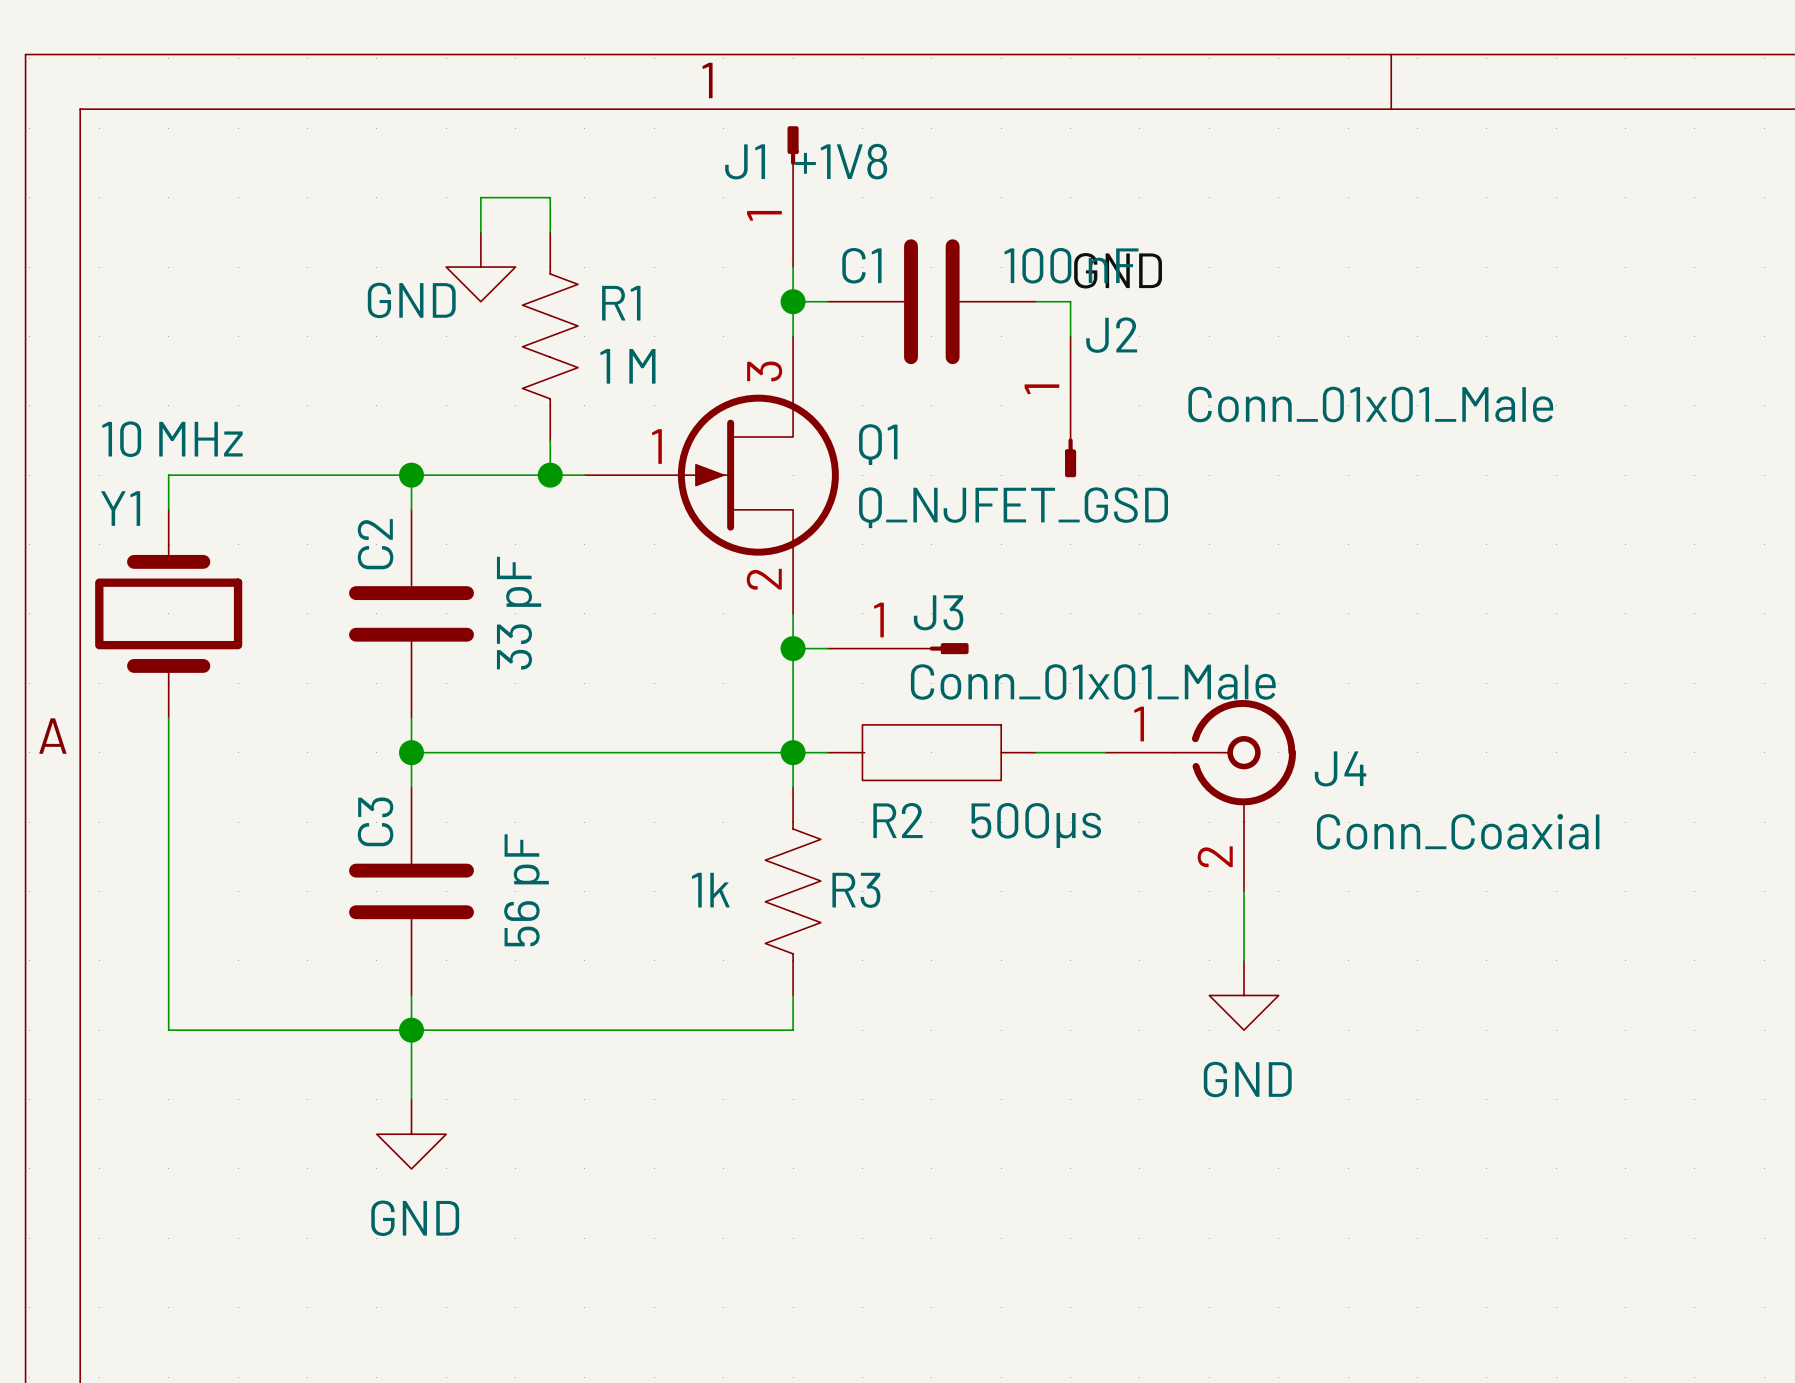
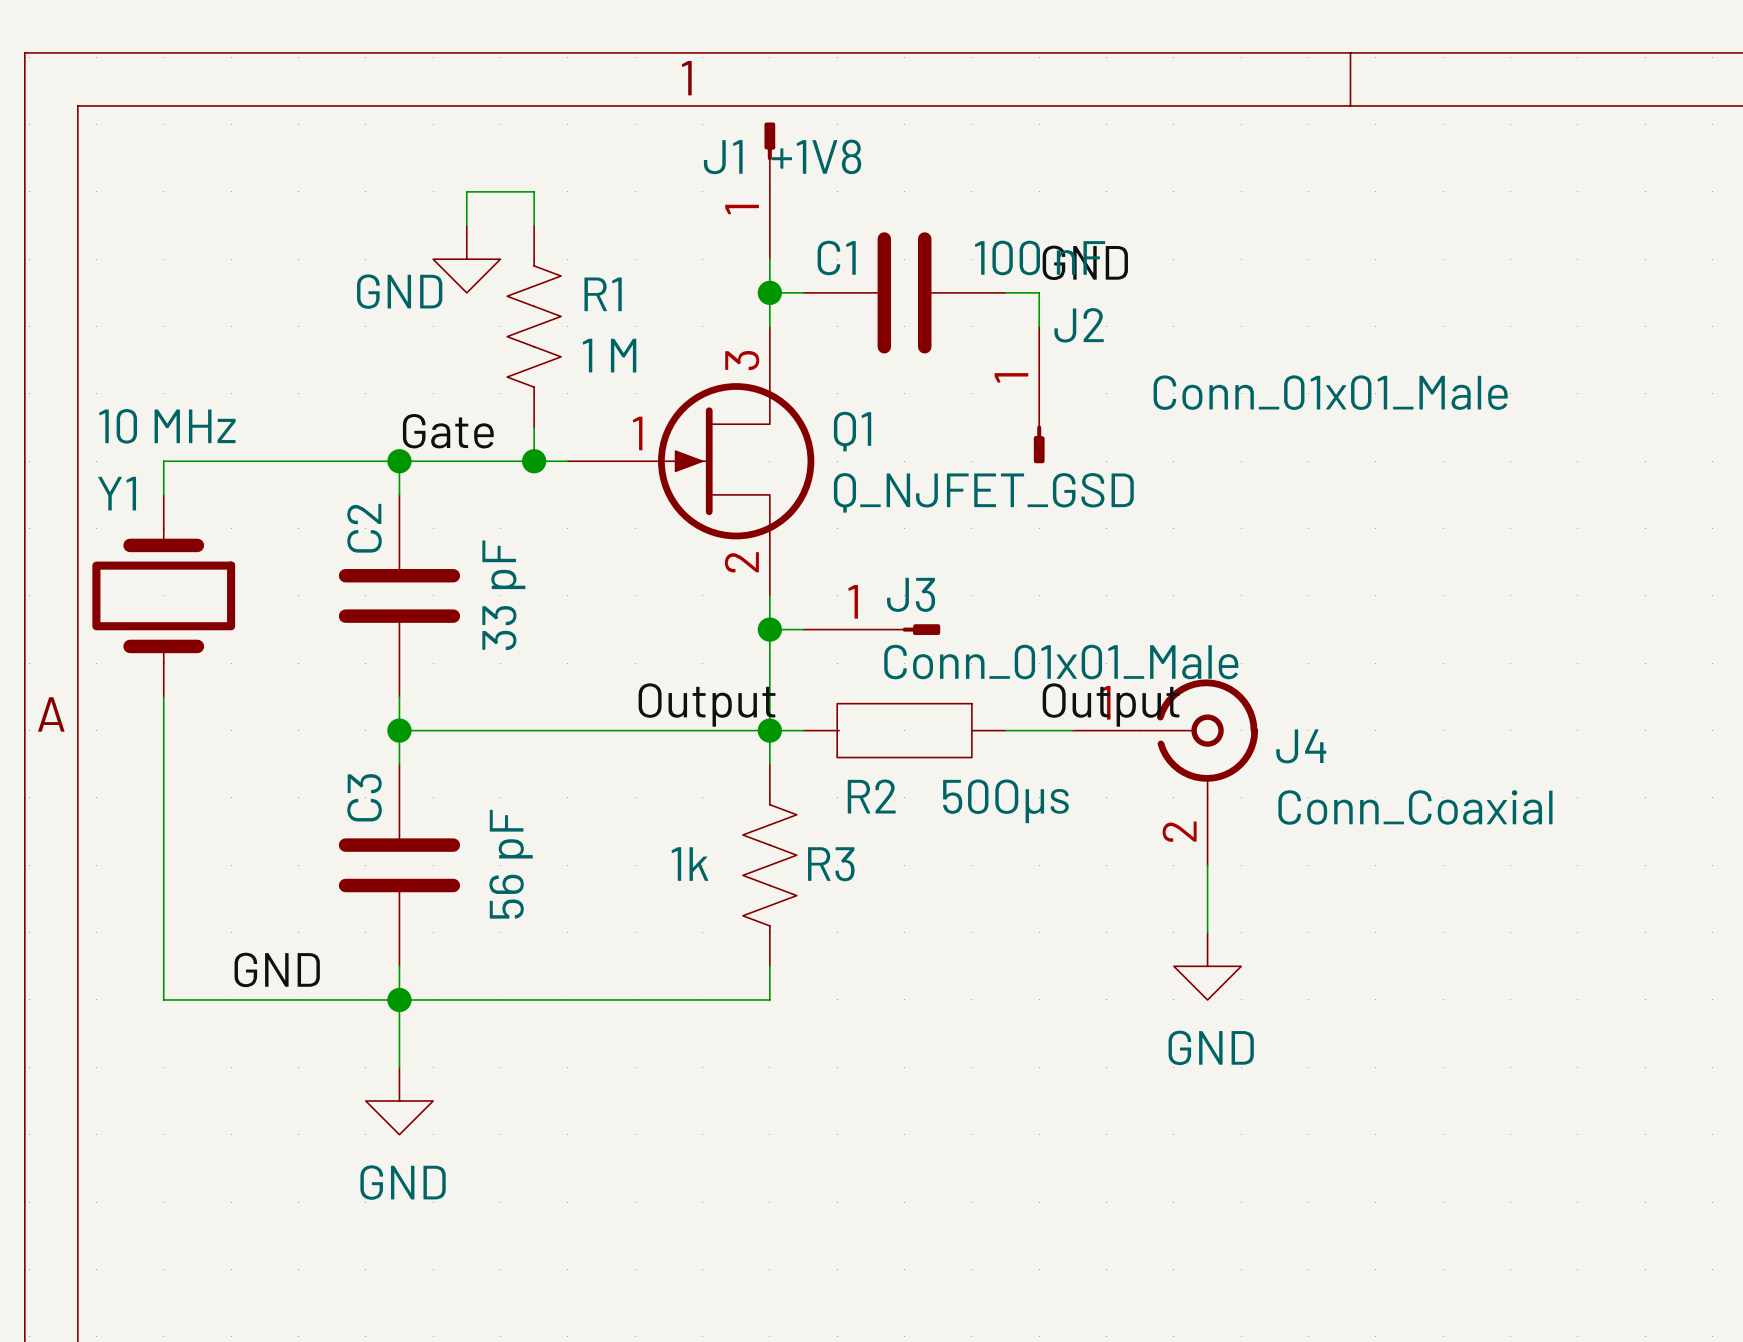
label: none -> Gate (448, 431)
label: none -> Output (707, 705)
label: none -> Output (1111, 705)
label: none -> GND (277, 969)

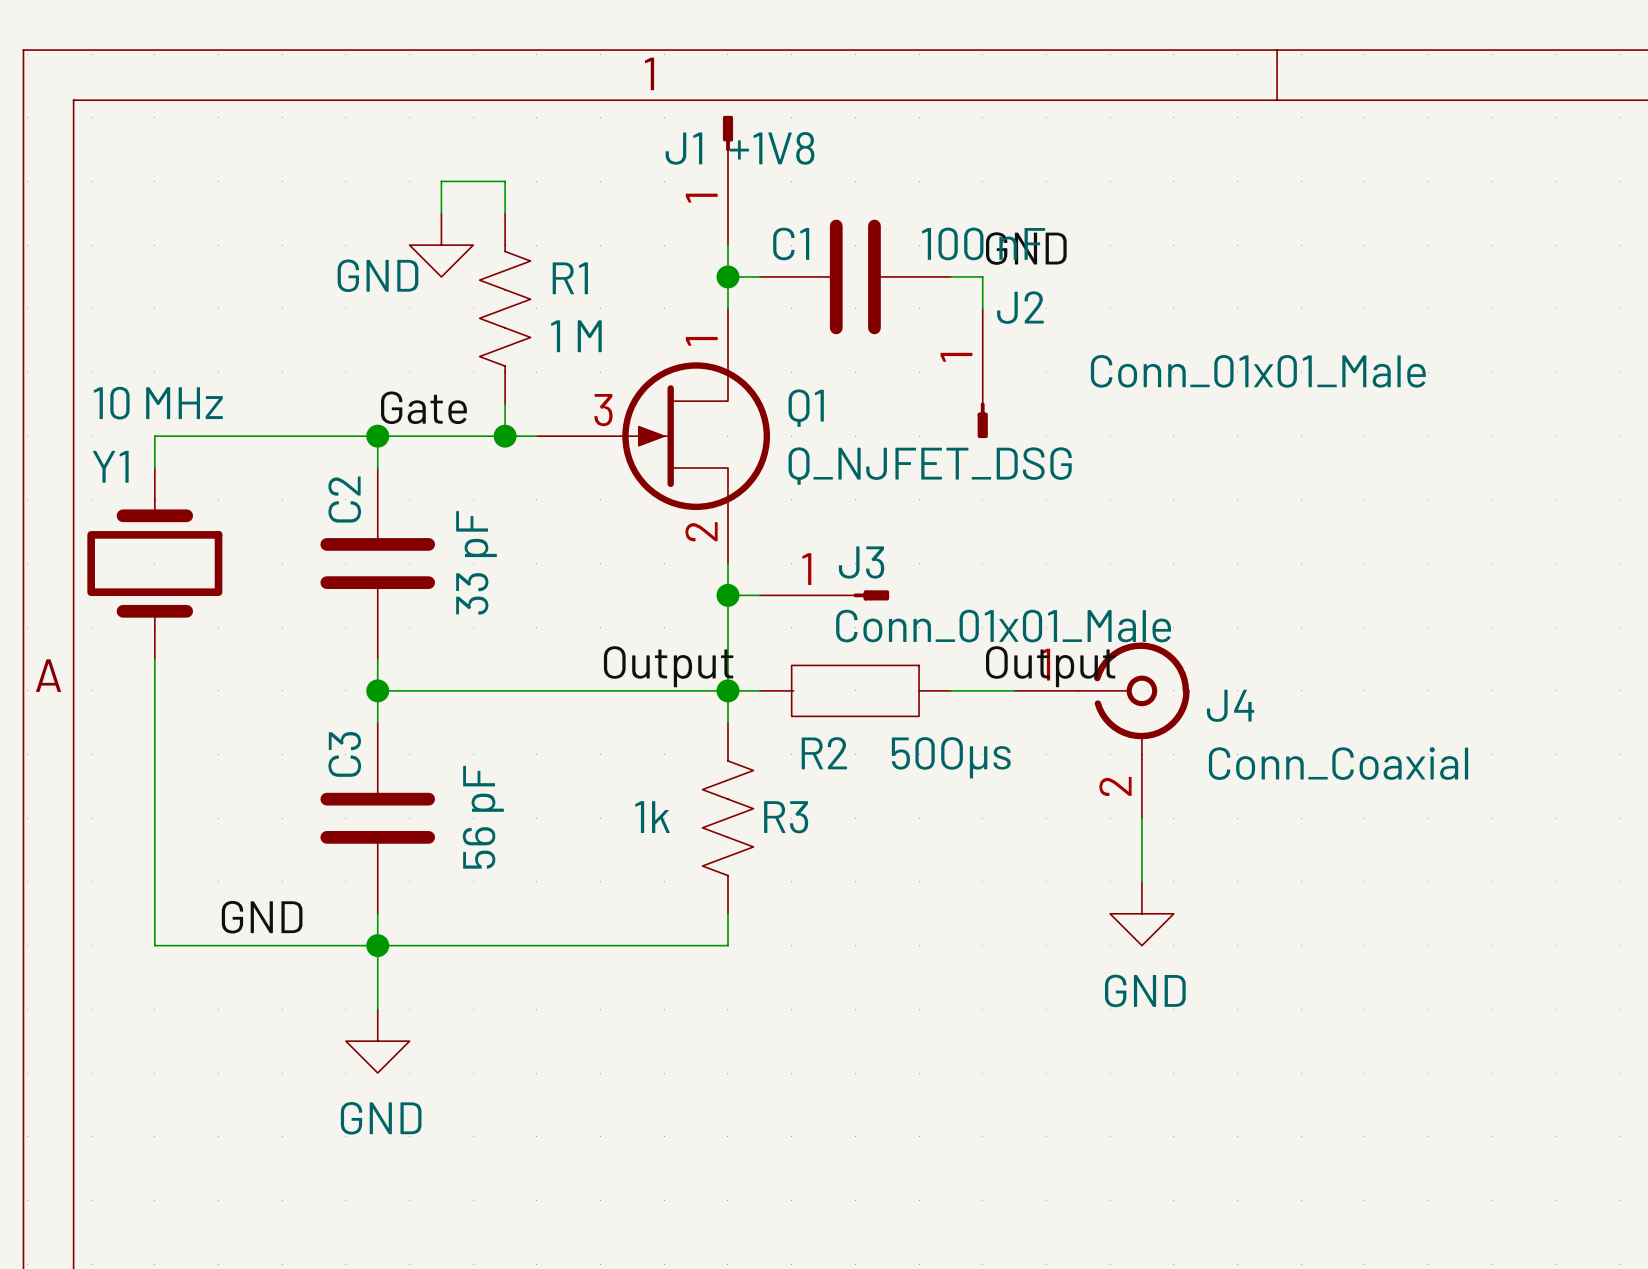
Q1 pin number: 3 (742, 360) -> 1 (701, 341)
Q1 pin number: 1 (637, 433) -> 3 (603, 410)
Q1 value: Q_NJFET_GSD (983, 492) -> Q_NJFET_DSG (930, 466)

